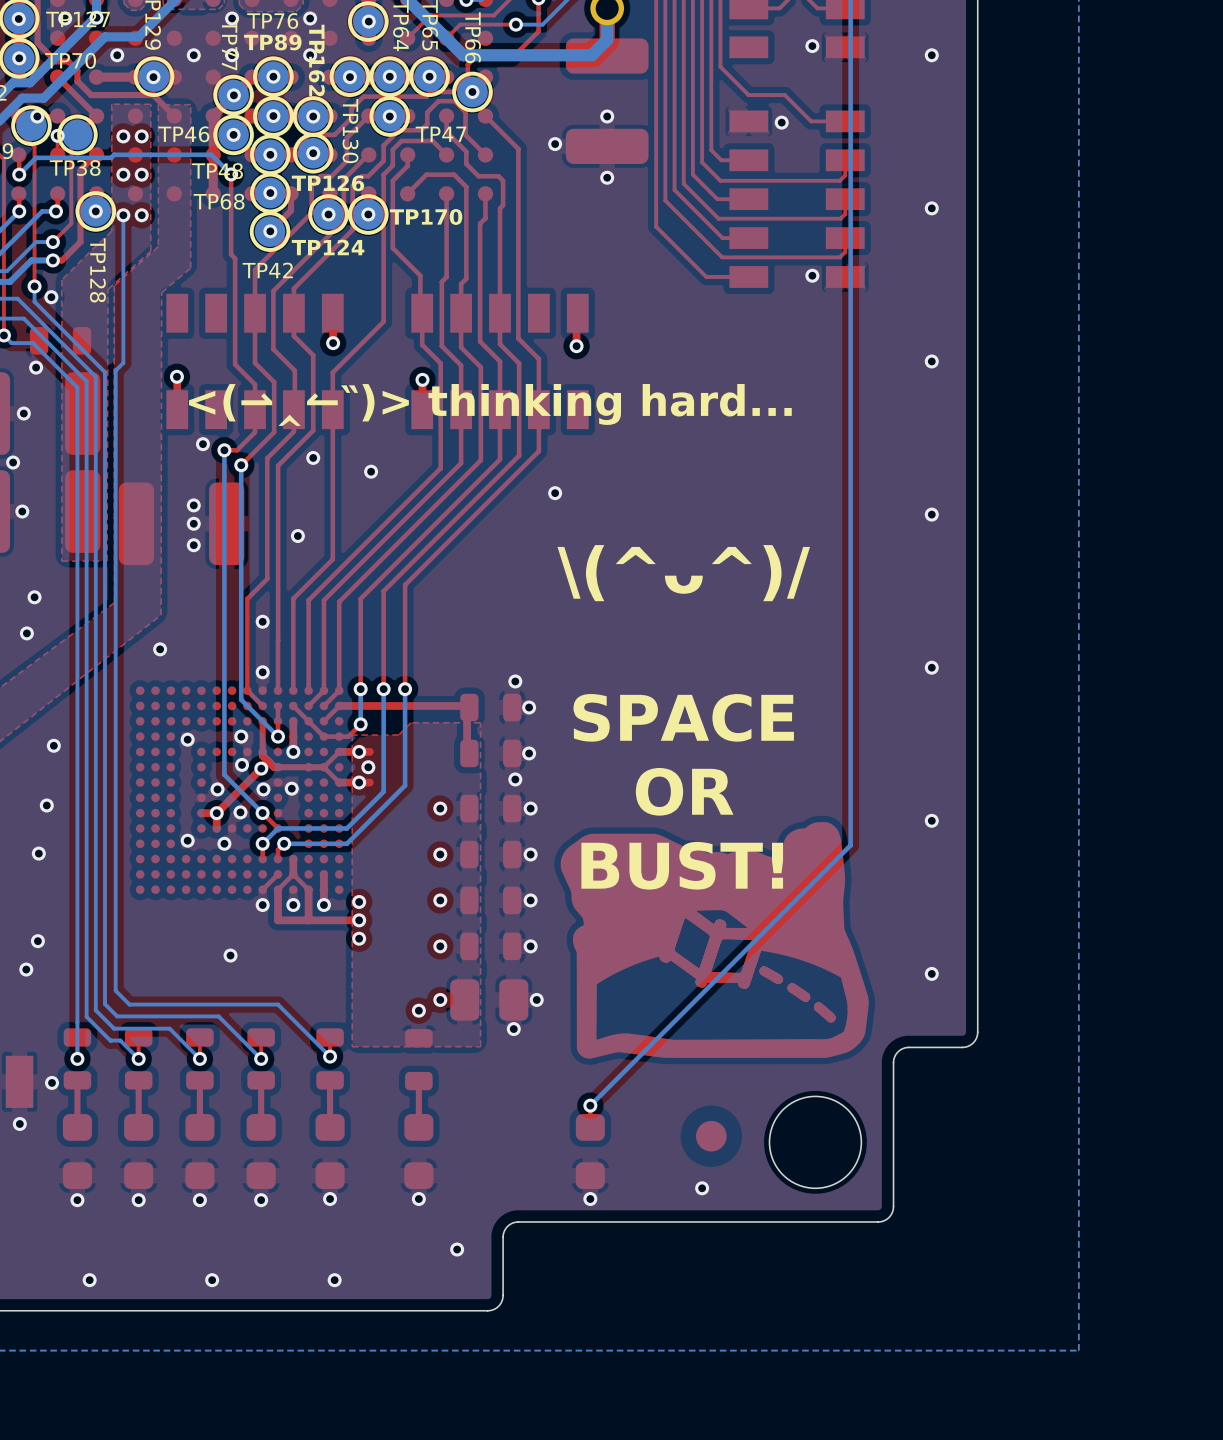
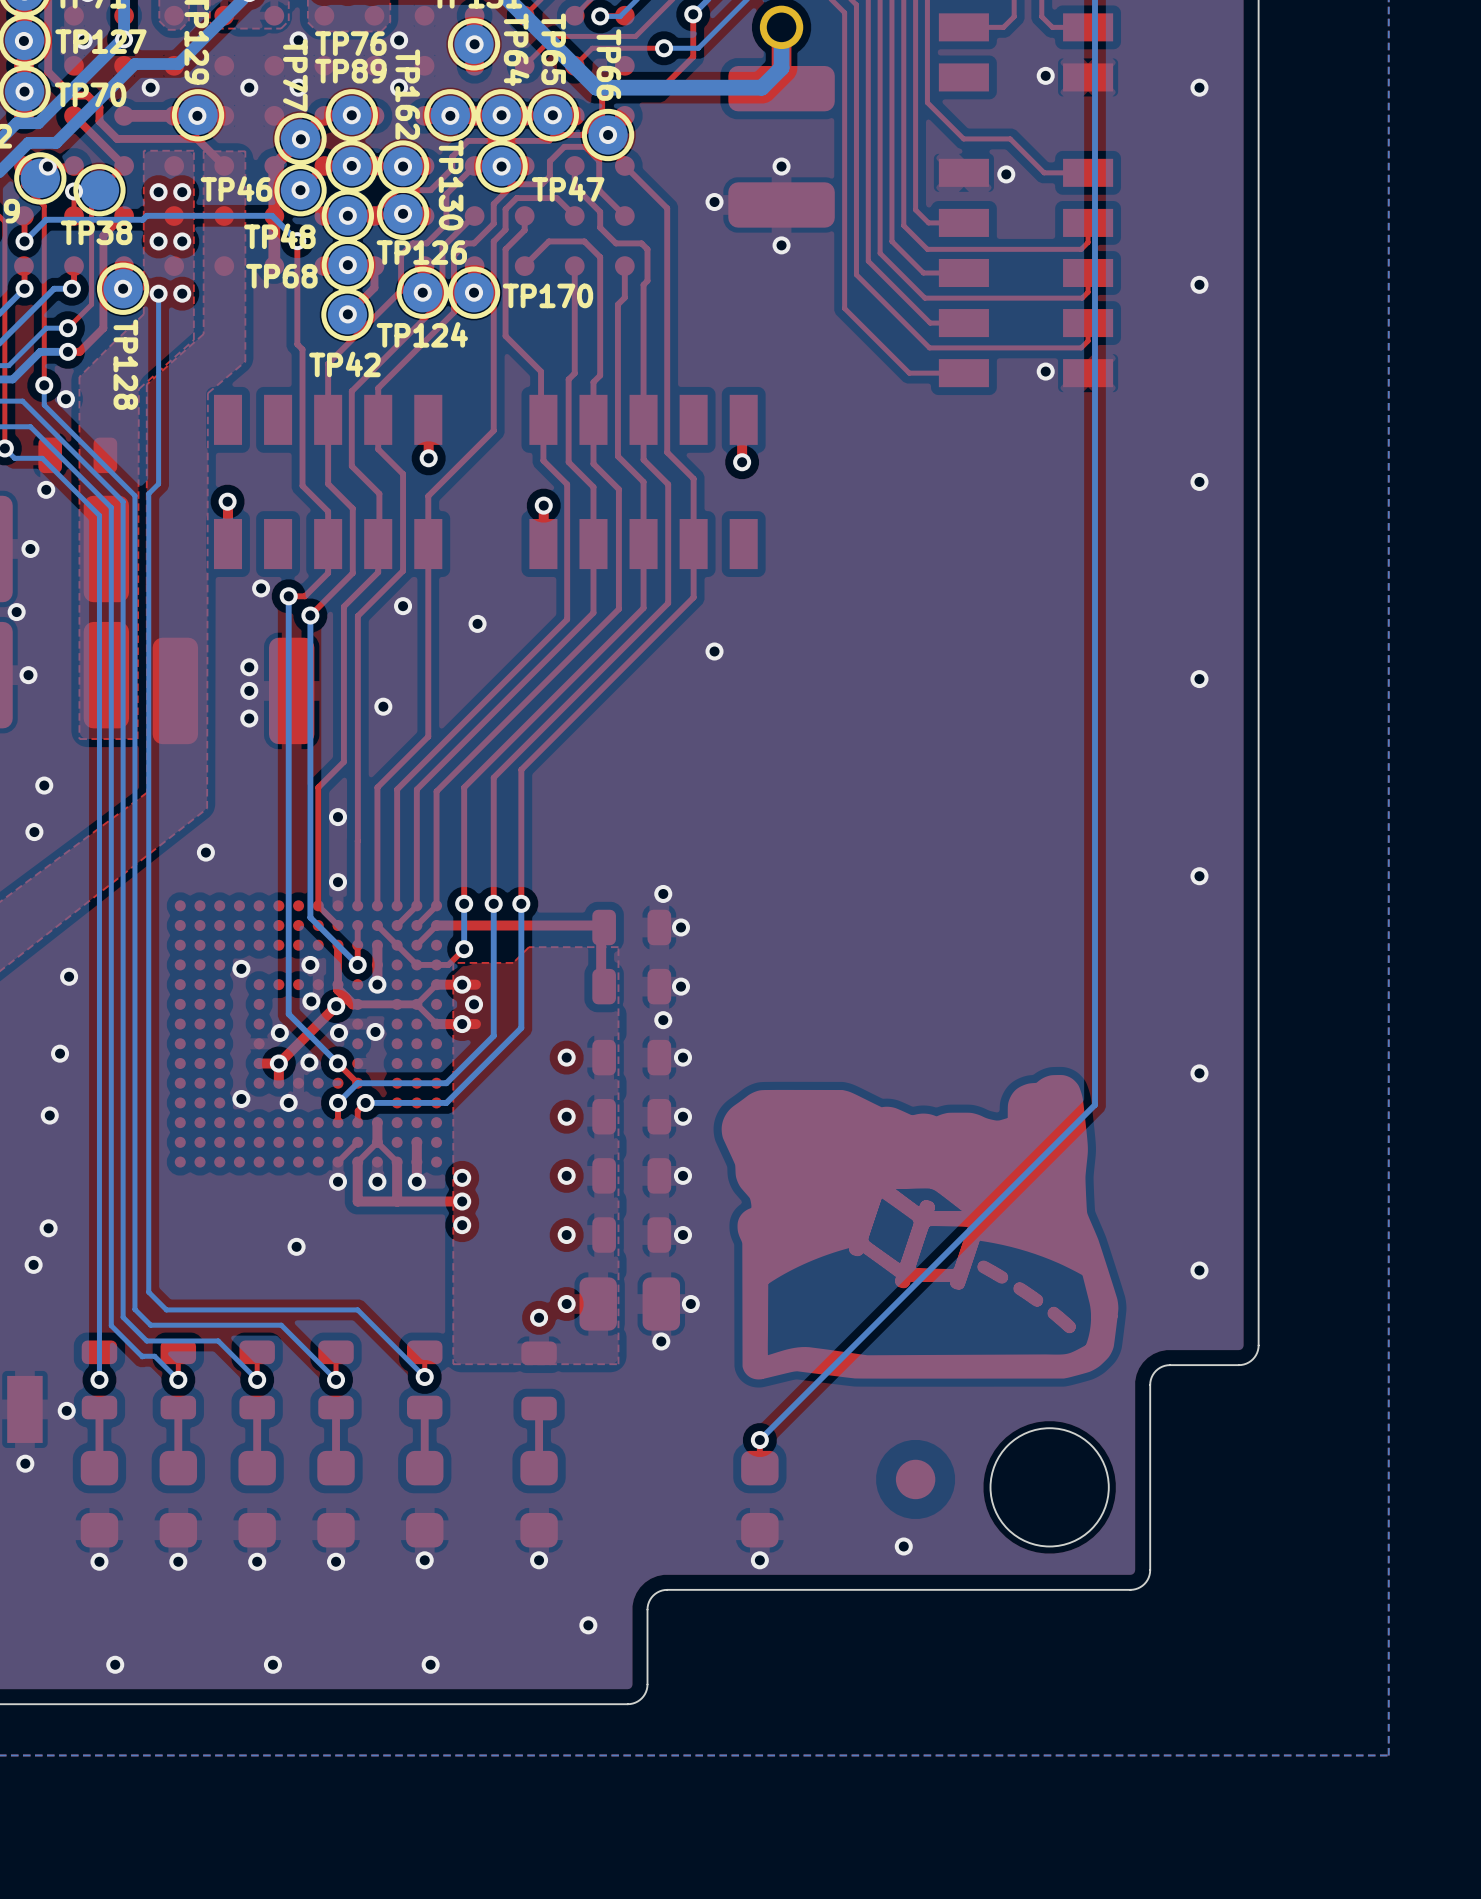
text: <(⇀‸↼‶)> thinking hard... (490, 404) -> none
text: \(^ᴗ^)/ (683, 573) -> none
text: SPACE (683, 717) -> none
text: OR (684, 791) -> none
text: BUST! (682, 865) -> none

